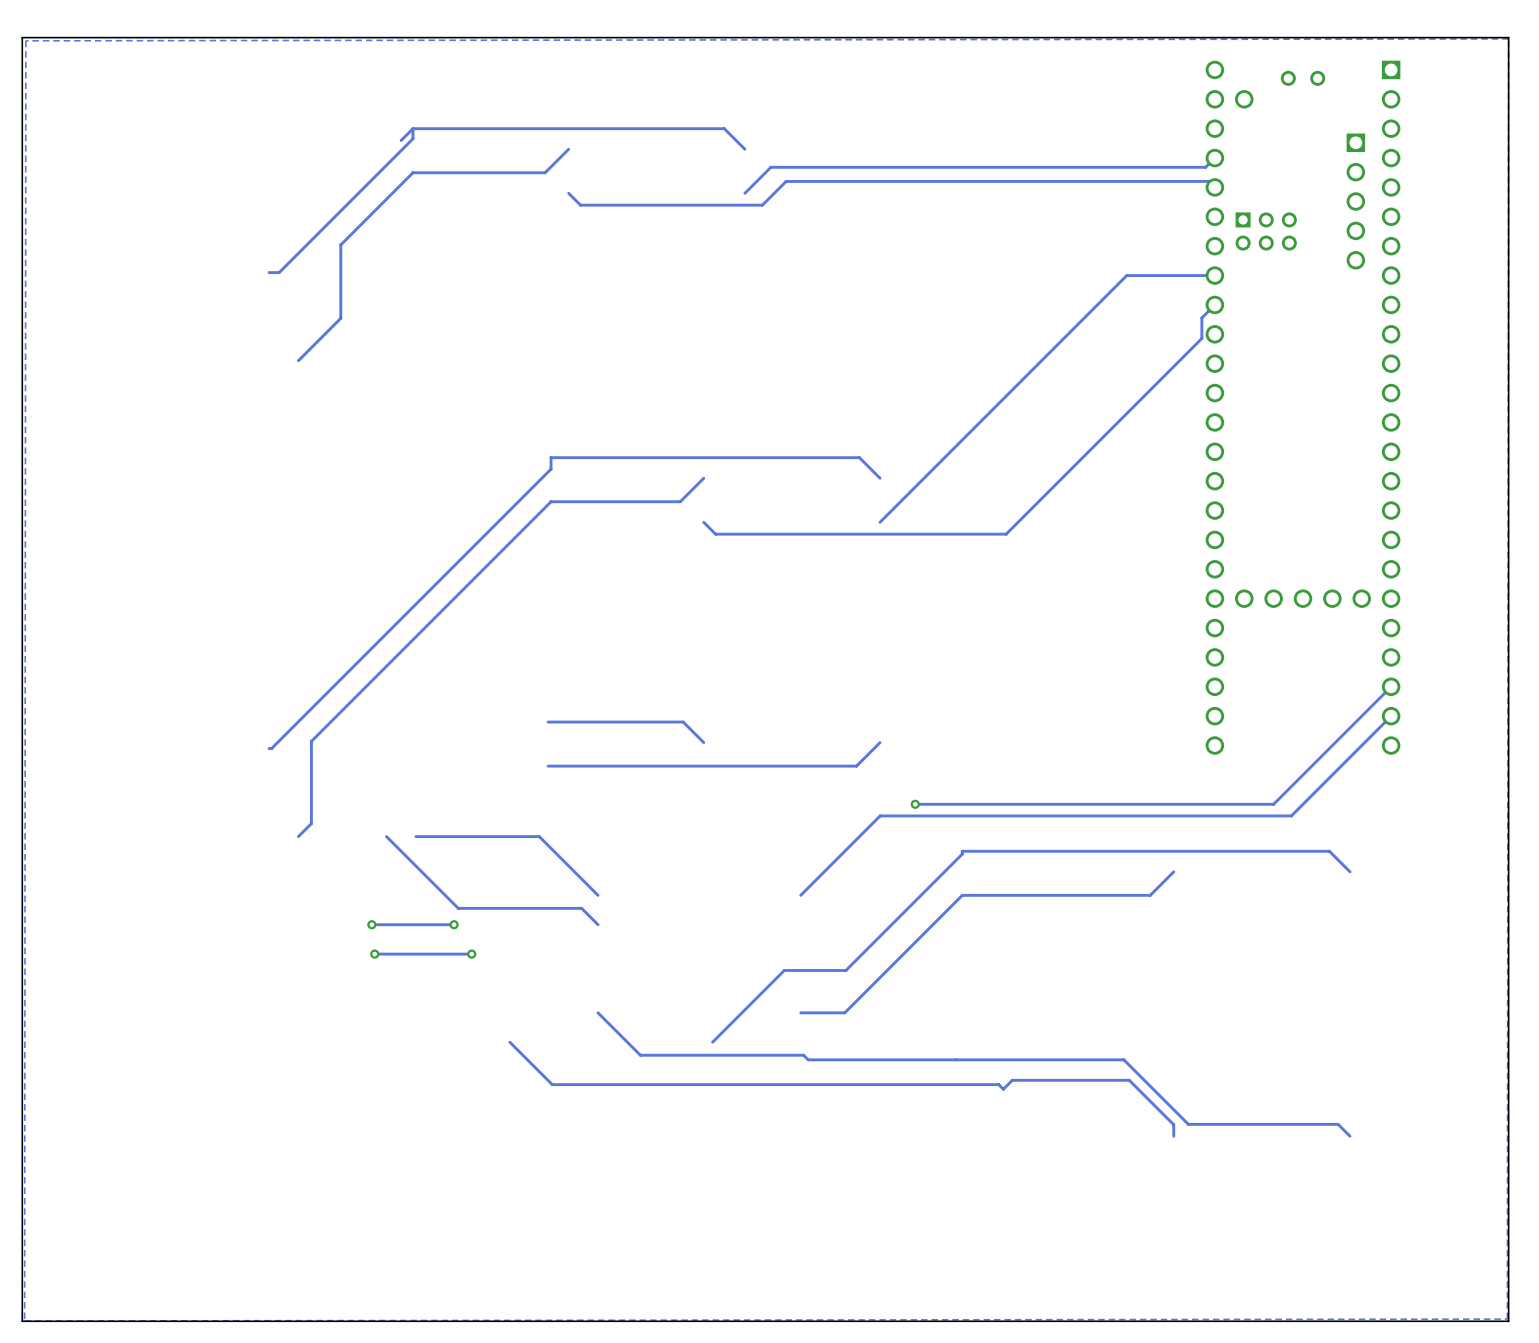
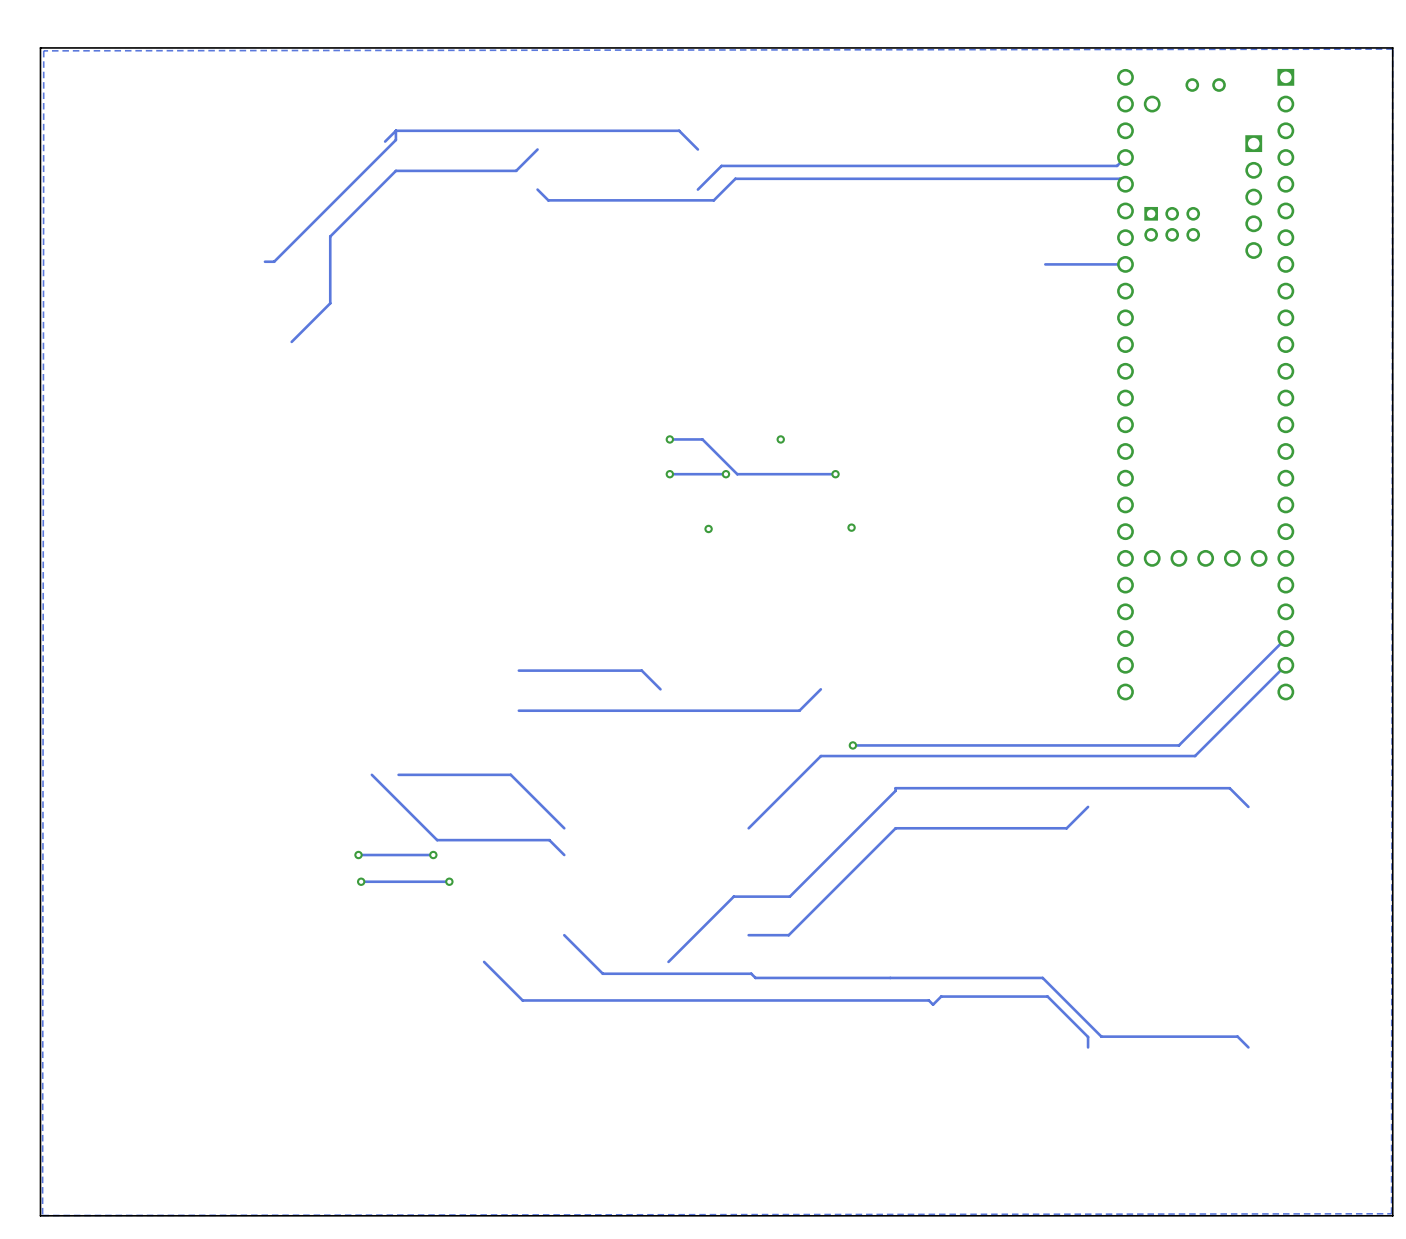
track: (1126, 275) (880, 522) -> none
track: (1214, 304) (1201, 317) (1201, 338) (1006, 534) (715, 534) (703, 522) -> none
track: none -> (669, 439) (702, 439) (737, 474) (835, 474)
via: none -> (669, 439)
via: none -> (780, 439)
track: (703, 478) (680, 501) (551, 501) (311, 741) (311, 823) (298, 836) -> none
track: (880, 478) (859, 457) (551, 457) (551, 469) (271, 748) (269, 748) -> none
via: none -> (669, 474)
track: none -> (725, 474) (669, 474)
via: none -> (725, 474)
via: none -> (835, 474)
via: none -> (851, 527)
via: none -> (708, 528)

